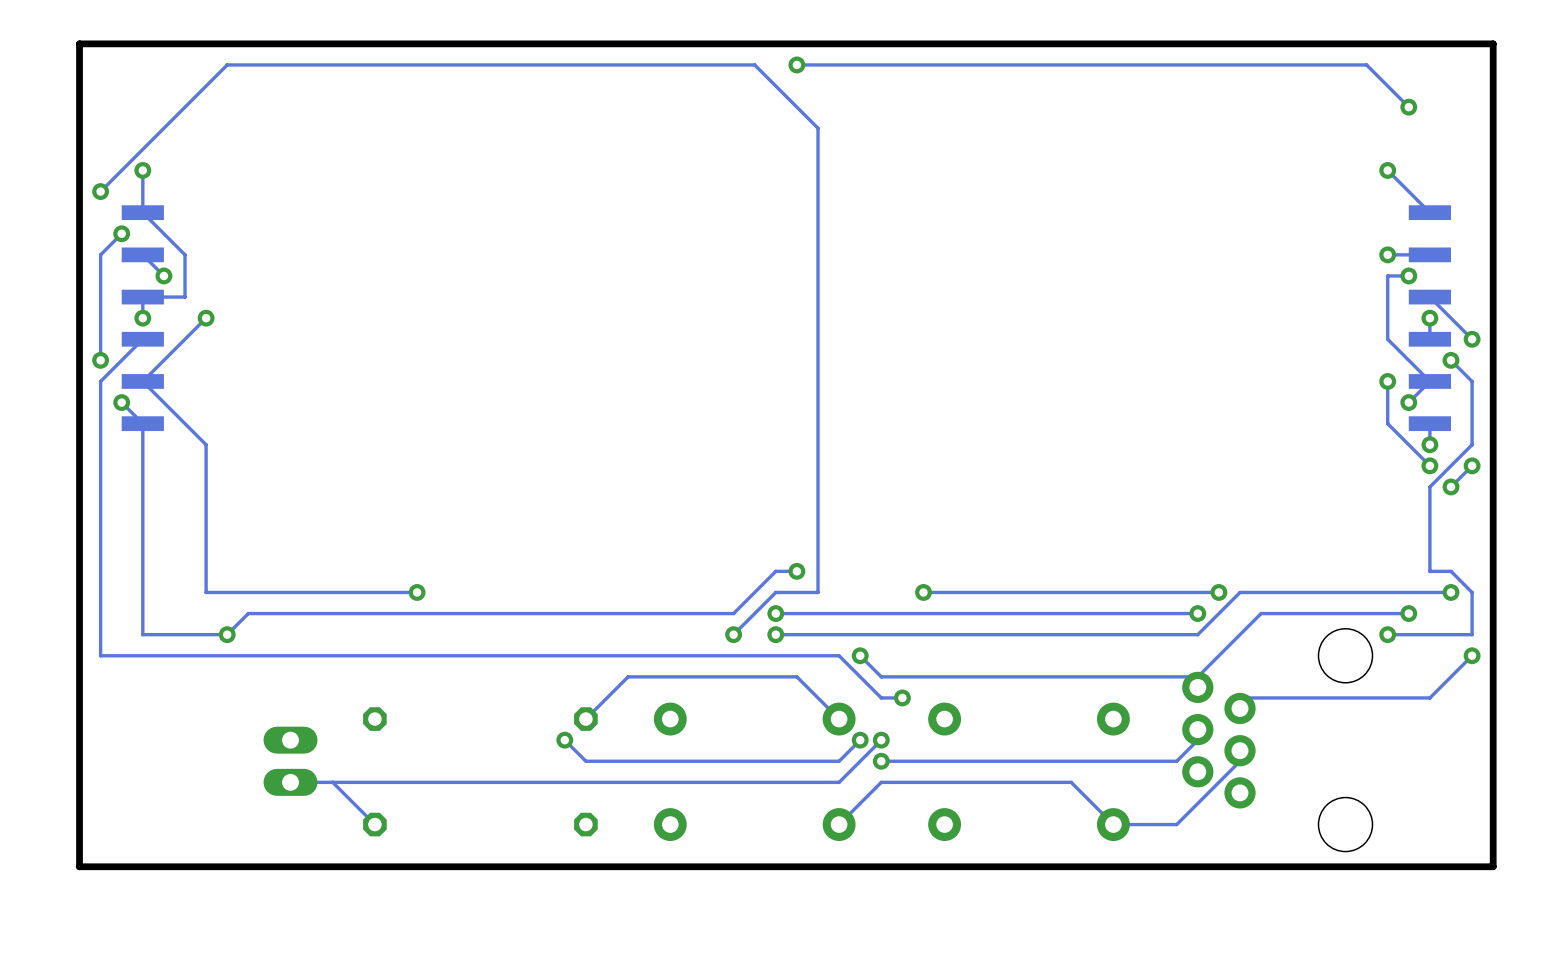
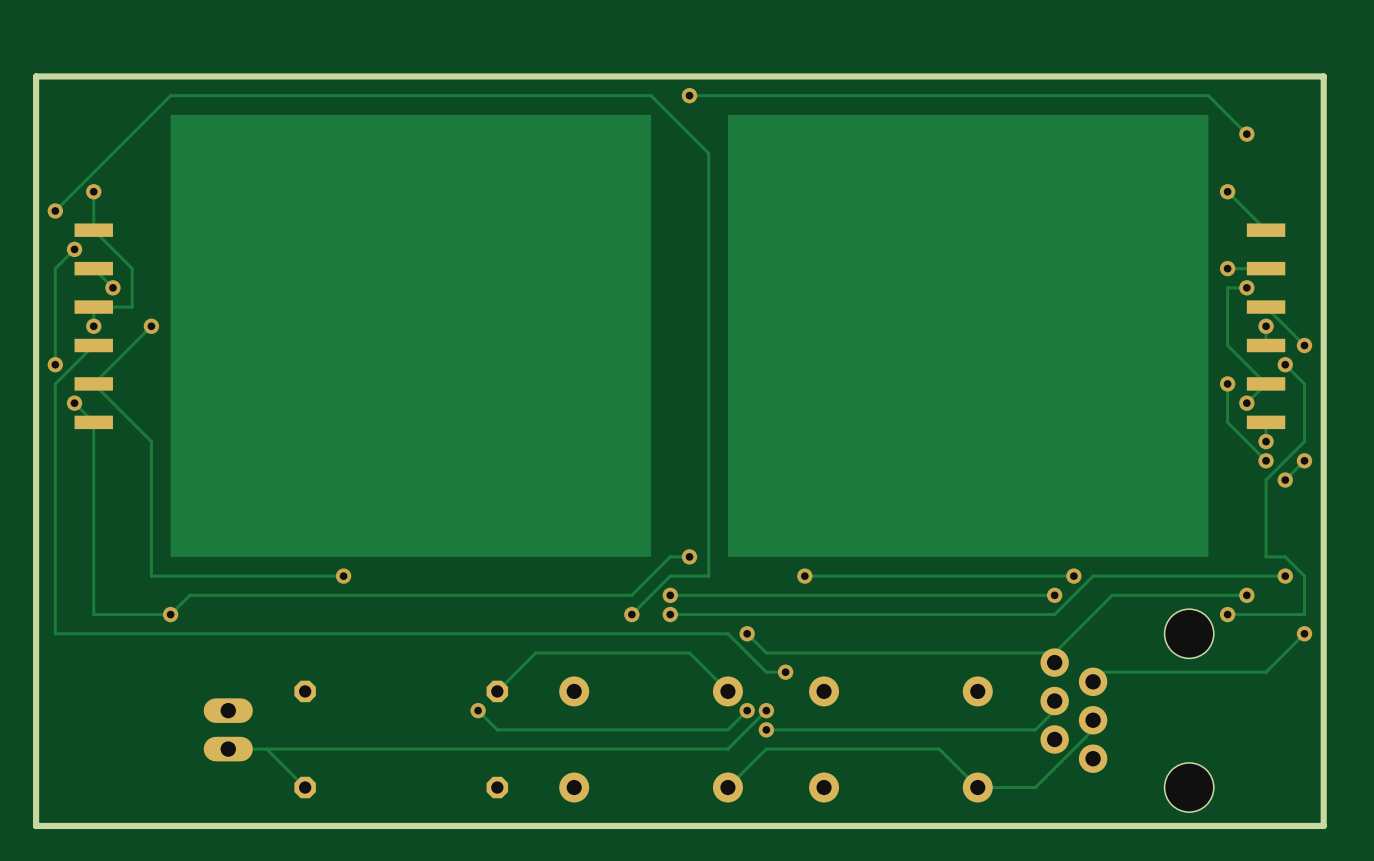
drawing: none -> [170, 114, 652, 557]
drawing: none -> [727, 114, 1209, 557]

